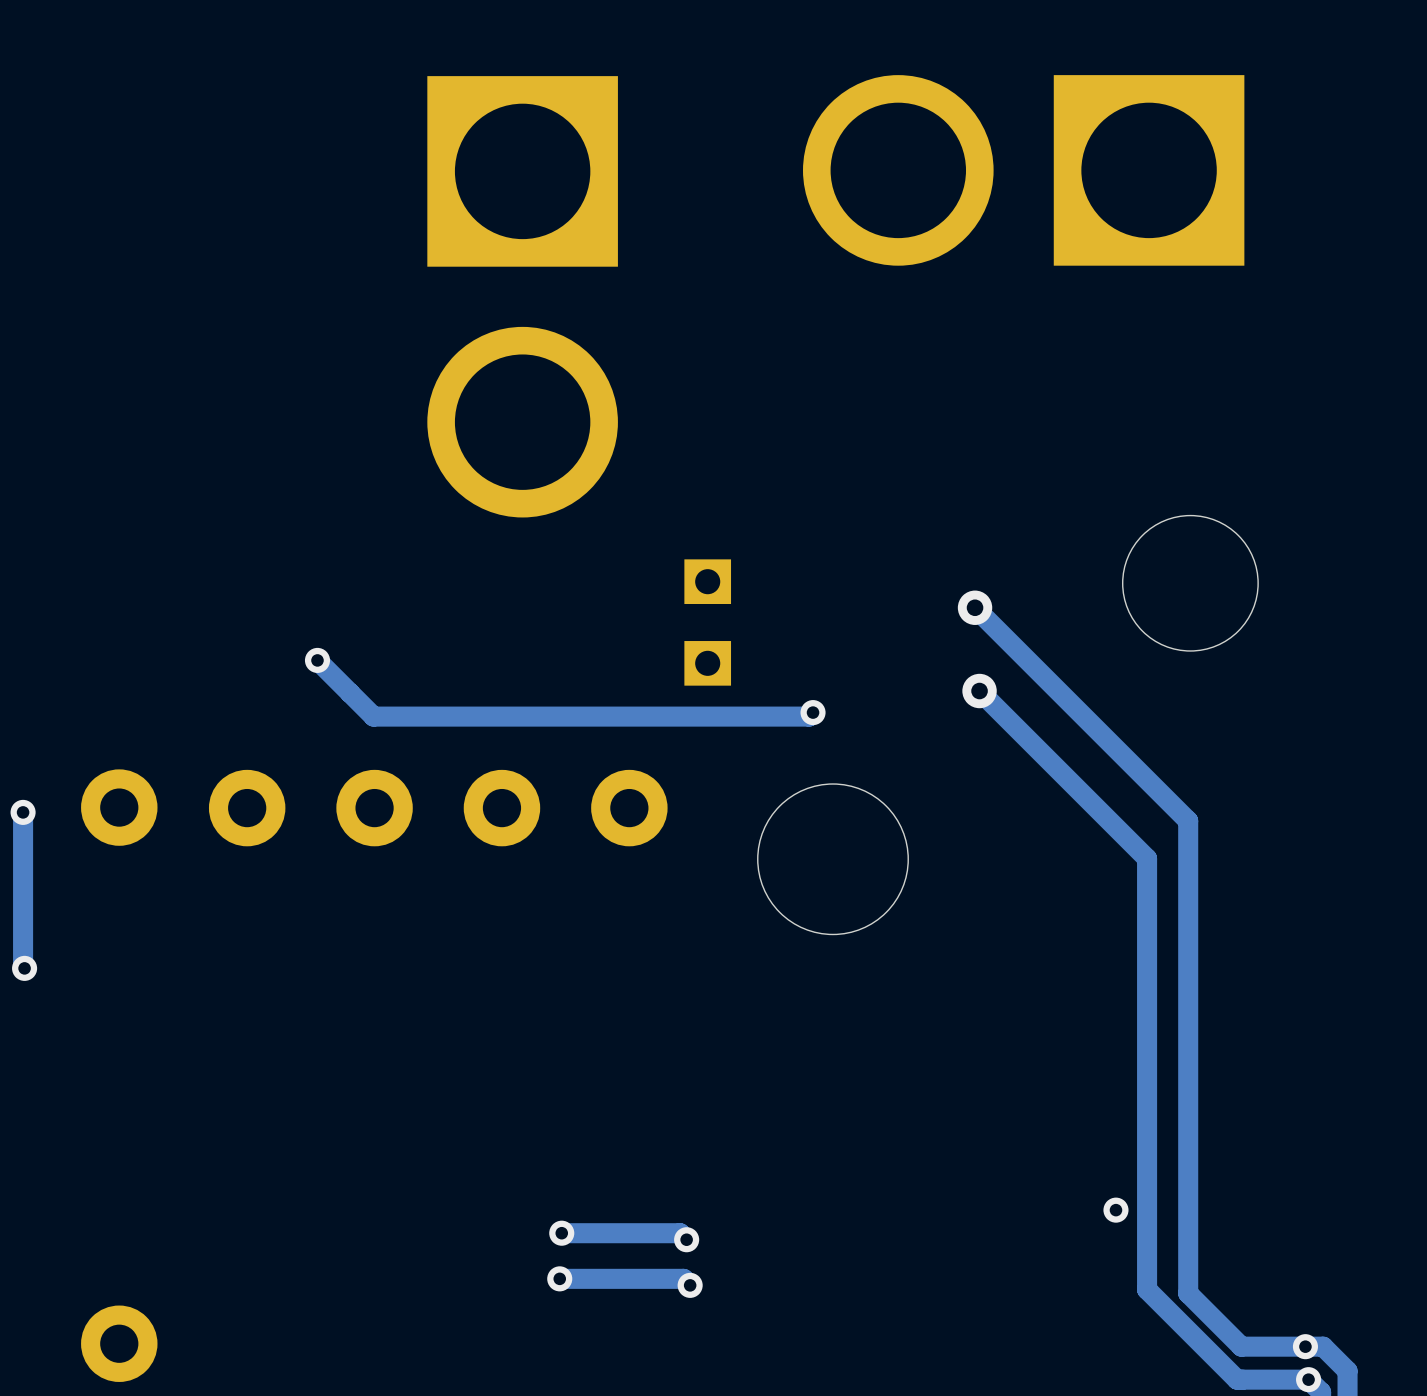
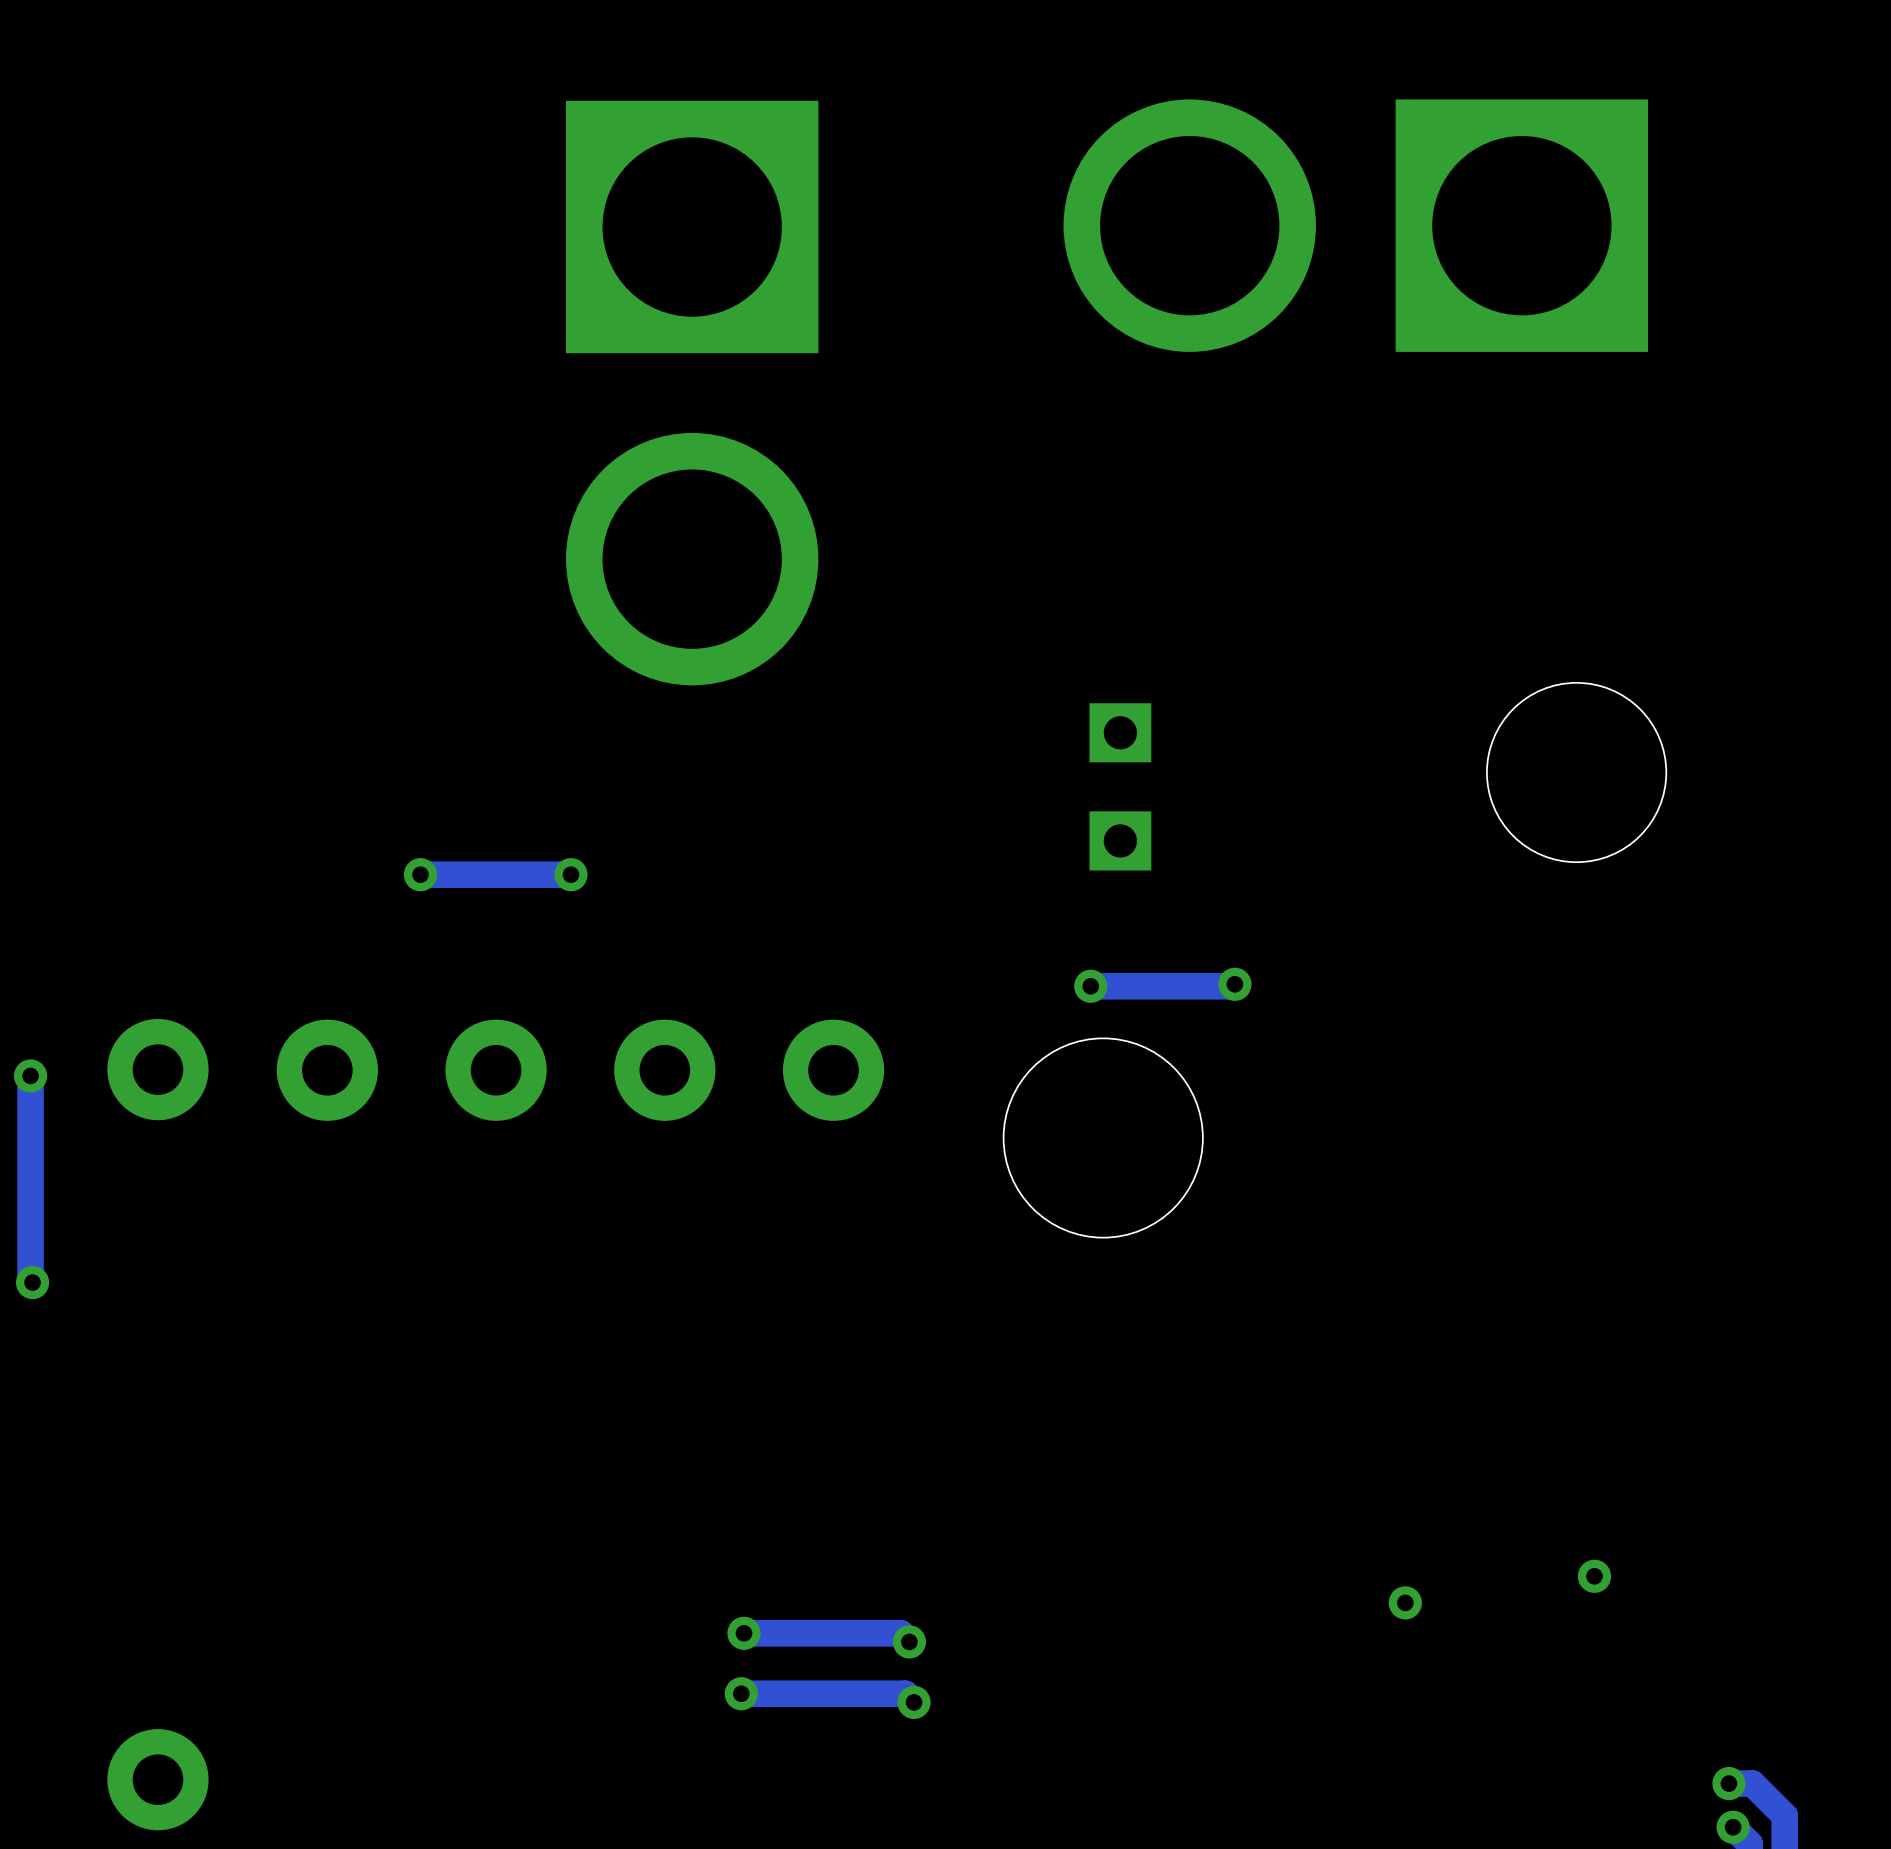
track: (975, 607) (1188, 820) (1188, 1293) (1241, 1346) (1305, 1346) -> none
via: (975, 607) -> none
part position: (707, 622) -> (1120, 786)
track: (317, 660) (373, 716) (809, 716) (813, 712) -> (420, 874) (570, 874)
via: none -> (570, 874)
track: (979, 691) (1147, 858) (1147, 1289) (1237, 1379) (1308, 1379) -> none
via: (979, 691) -> none
via position: (813, 712) -> (1090, 986)
track: none -> (1234, 984) (1232, 986) (1090, 986)
via: none -> (1234, 984)
via: none -> (1594, 1576)
via: none -> (1405, 1602)
via: (1115, 1210) -> none

